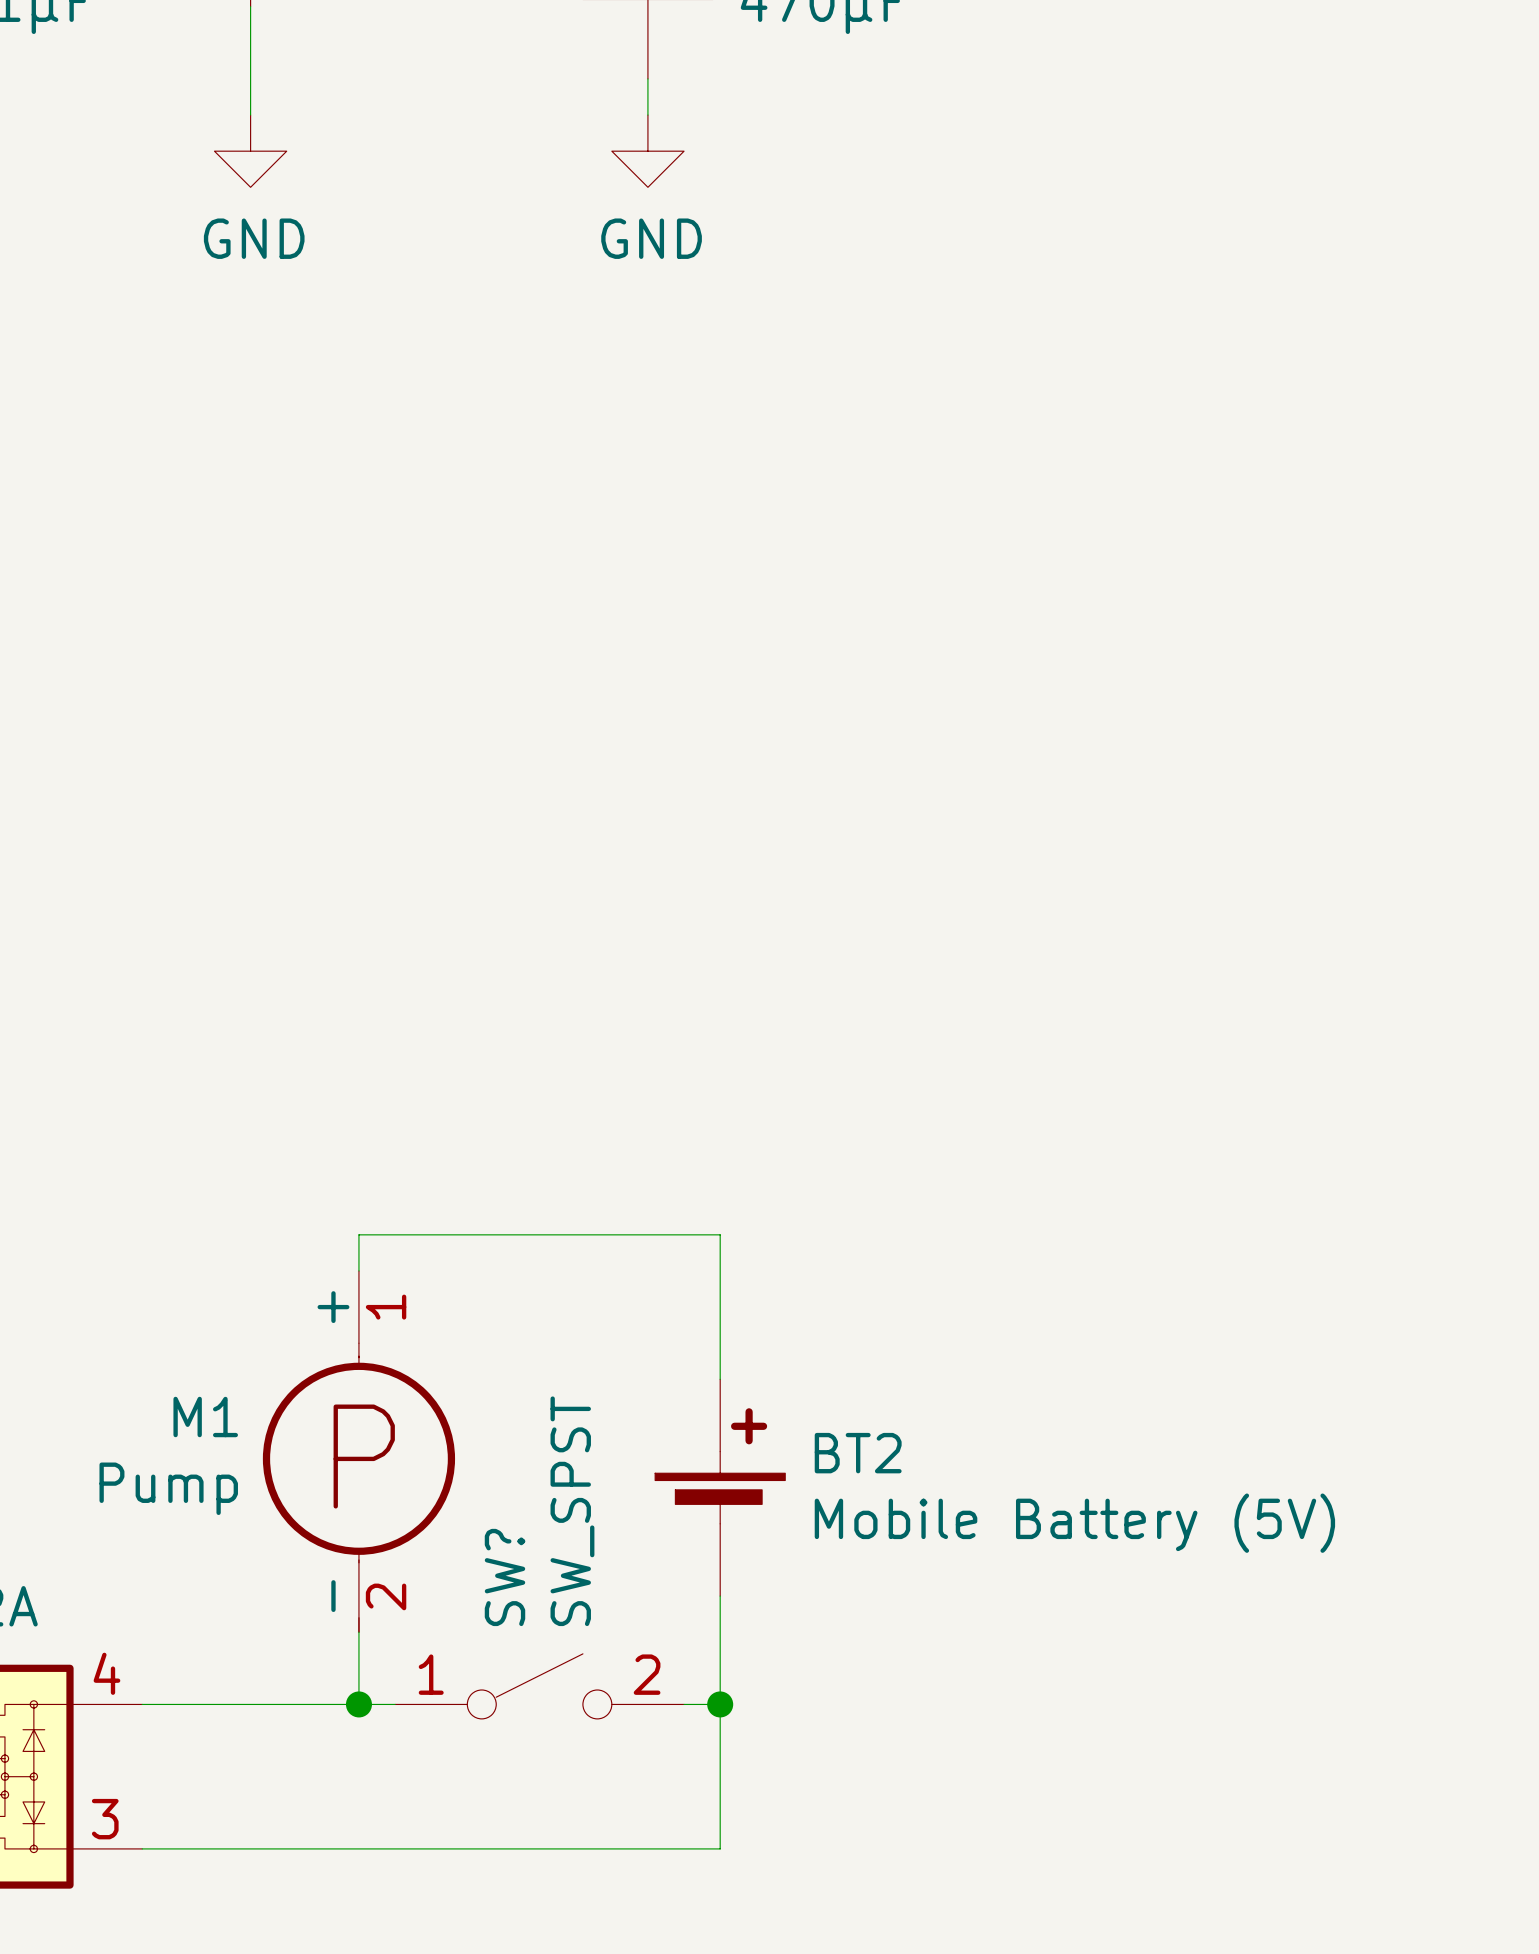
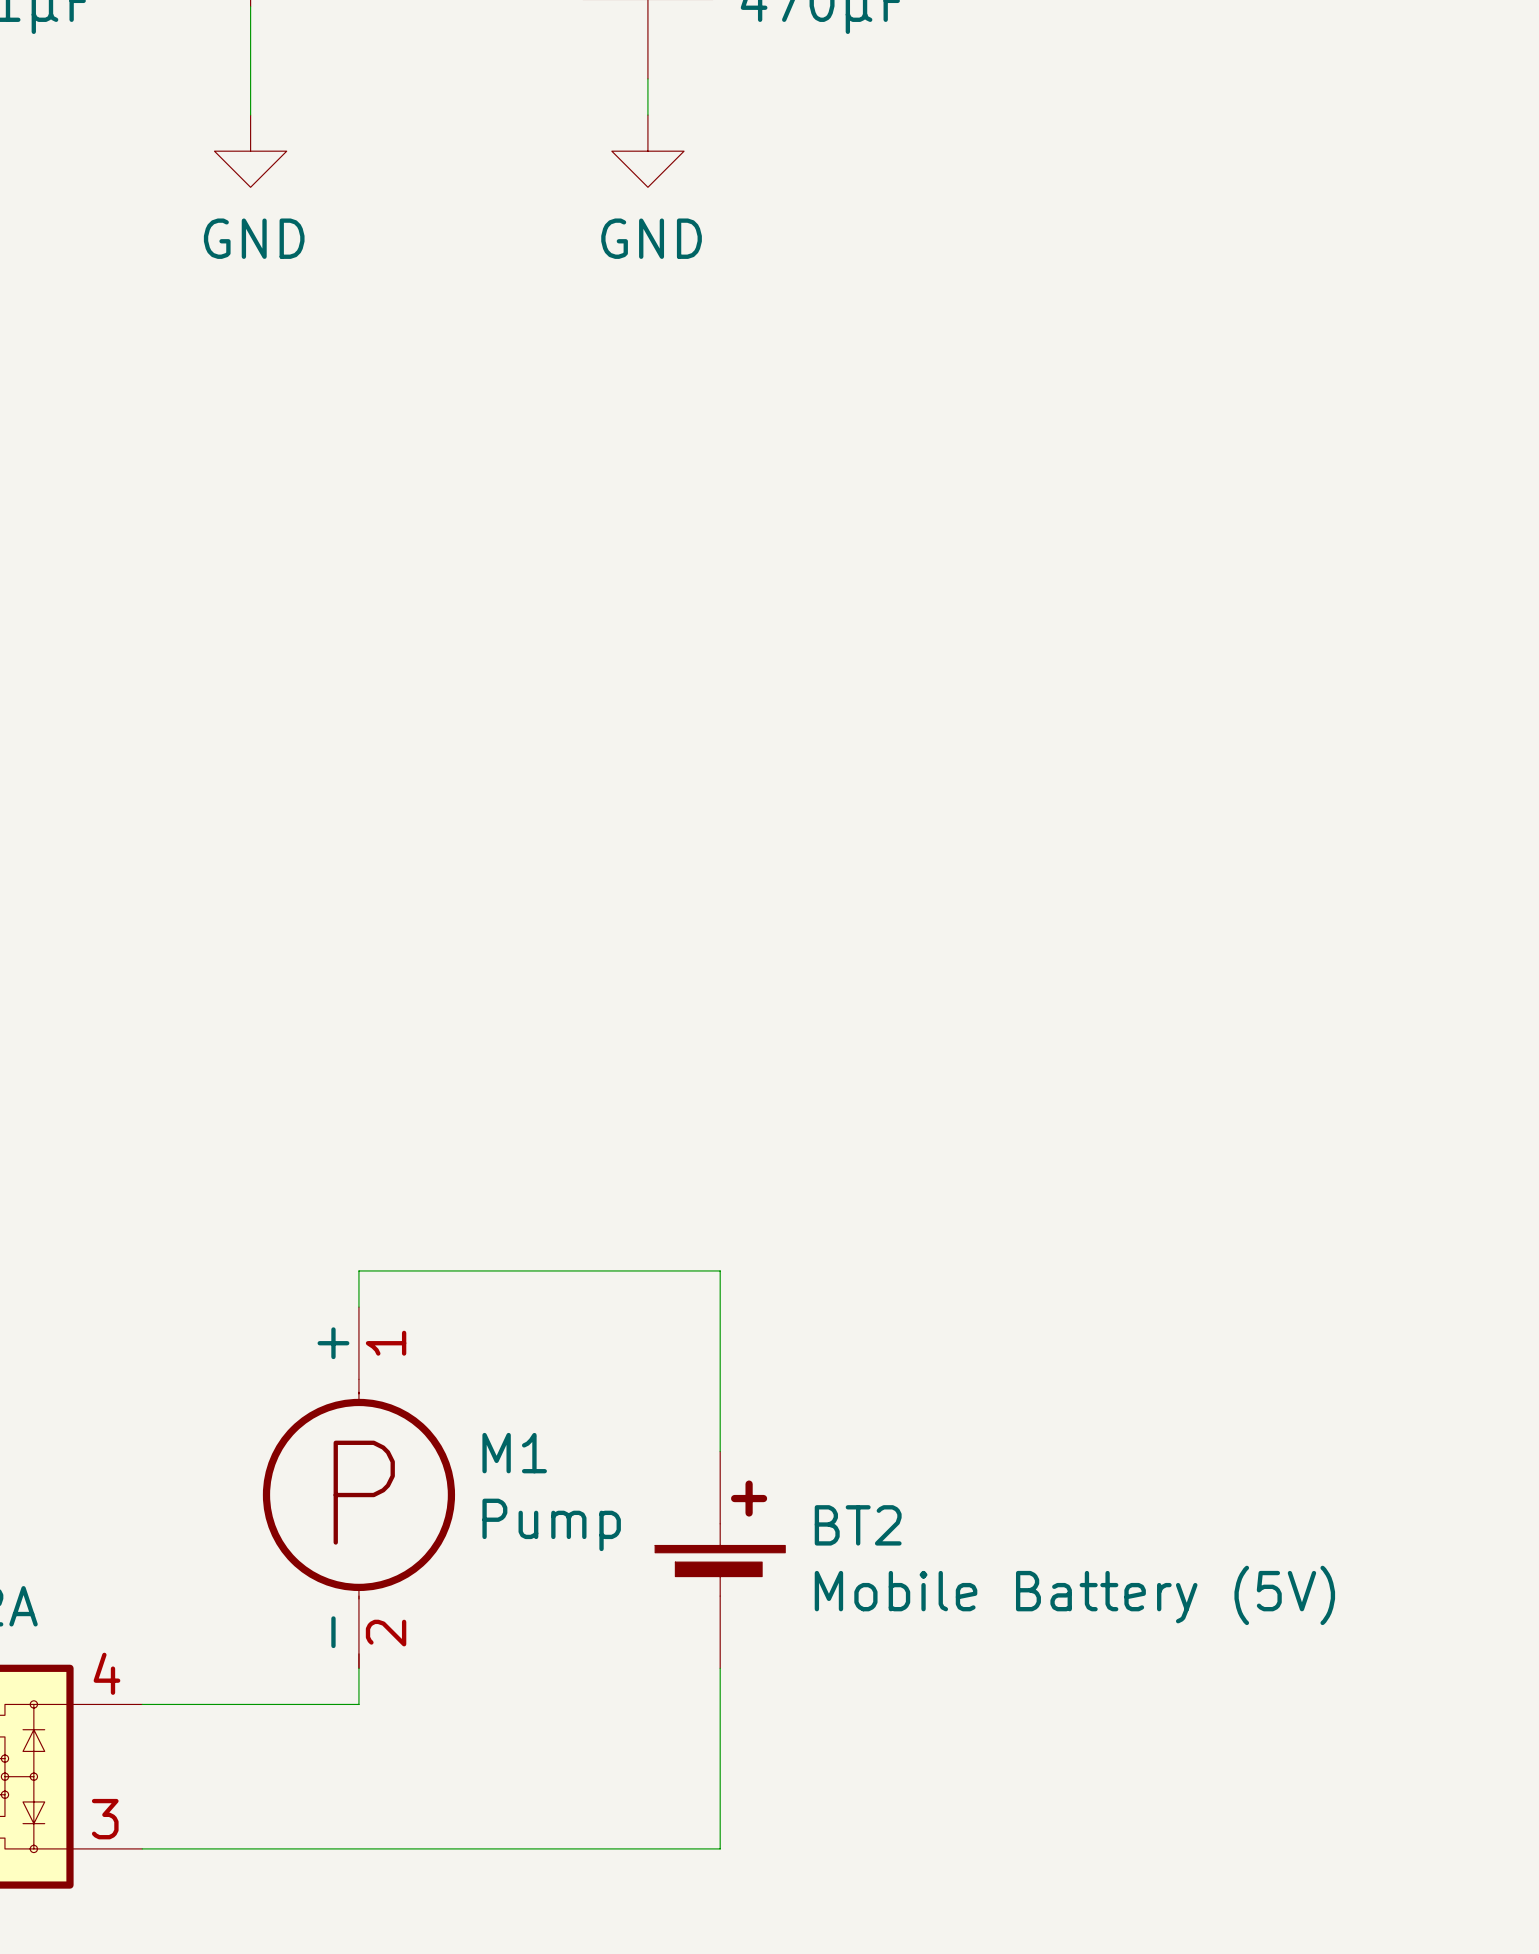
wire: (358, 1270) (358, 1234) (720, 1234) (720, 1270) -> (358, 1307) (358, 1270) (720, 1270)
M1 name position: M1 (205, 1417) -> M1 (514, 1453)
M1 position: (358, 1451) -> (358, 1487)
BT2 position: (720, 1487) -> (720, 1559)
M1 value position: Pump (168, 1488) -> Pump (551, 1524)
SW?: SW_SPST (539, 1686) -> none
wire: (358, 1704) (395, 1704) -> none
junction: (358, 1704) -> none
wire: (684, 1704) (720, 1704) -> none
junction: (720, 1704) -> none

